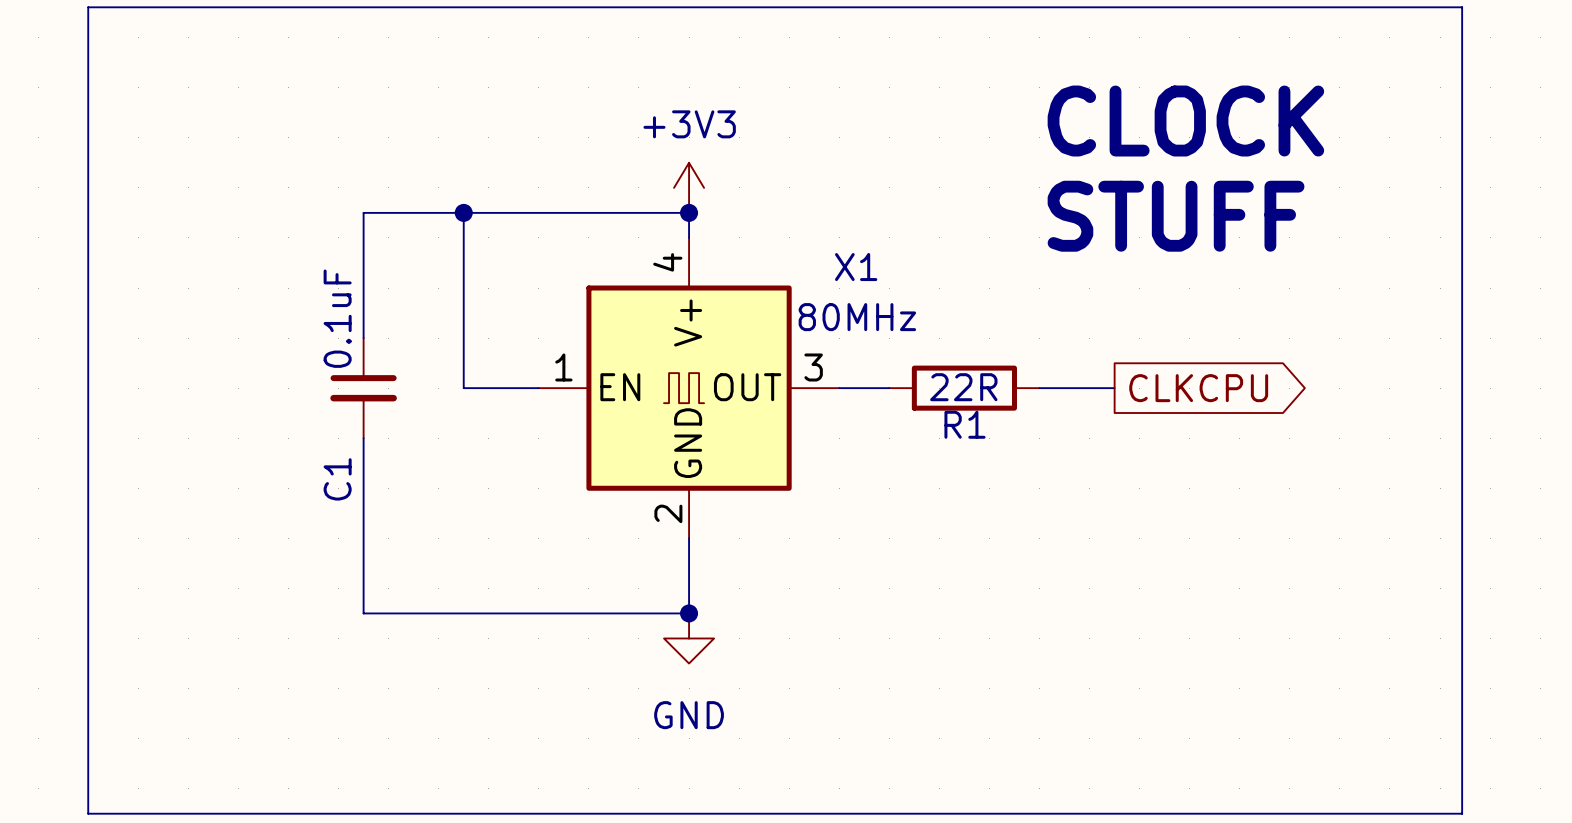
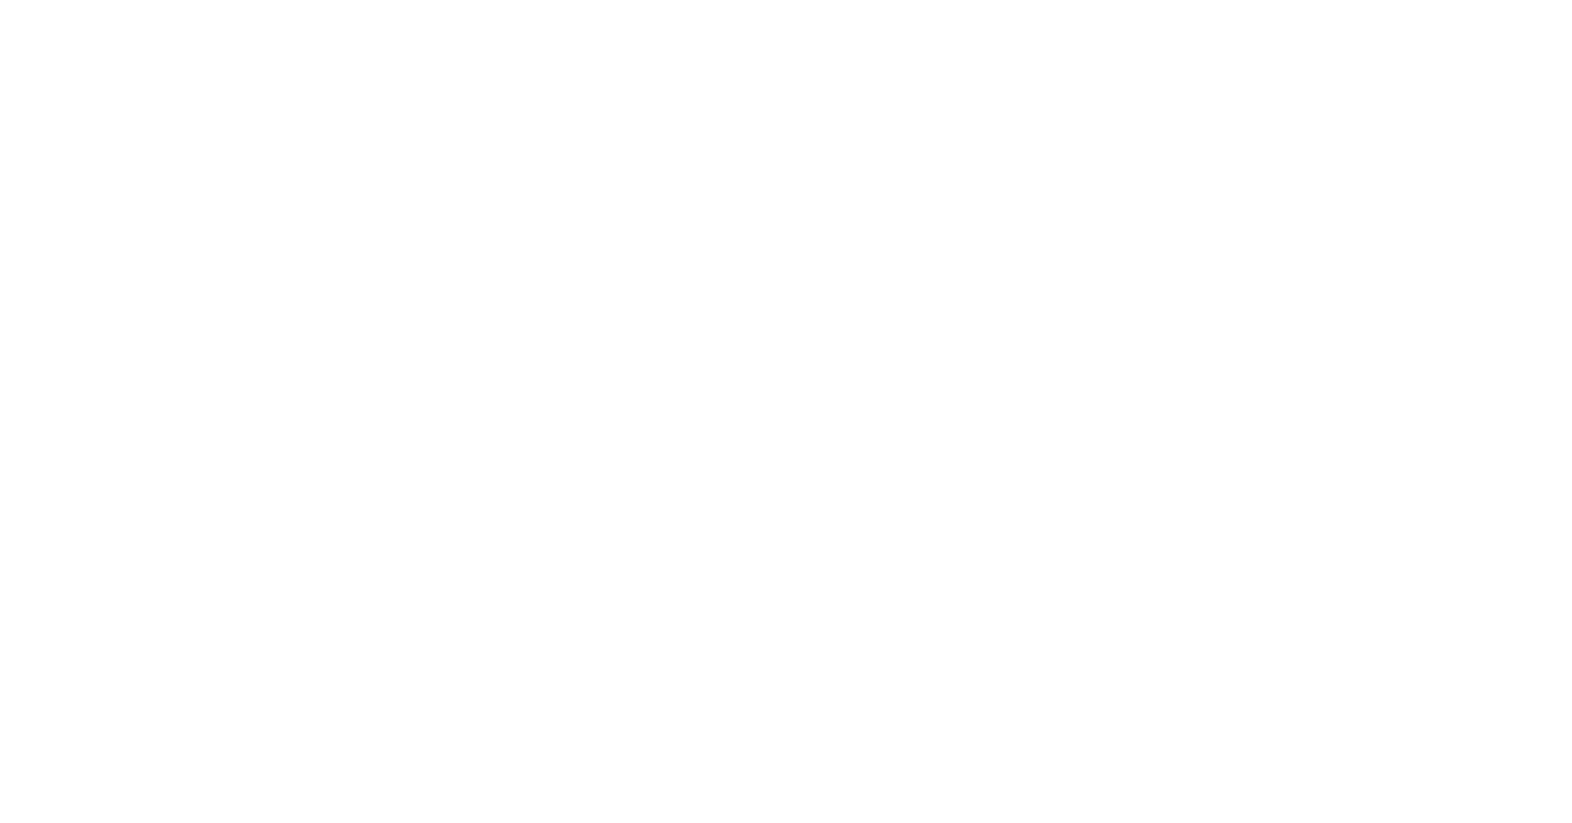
line: (88, 7) (1462, 7) (1462, 813) (88, 813) (88, 7) -> none
text: CLOCK (1185, 121) -> none
power symbol: +3V3 (689, 187) -> none
wire: (463, 212) (463, 388) (538, 388) -> none
junction: (463, 212) -> none
junction: (689, 212) -> none
text: STUFF (1176, 216) -> none
wire: (689, 237) (689, 212) (363, 212) (363, 338) -> none
C1: 0.1uF (363, 388) -> none
X1: 80MHz (689, 388) -> none
wire: (839, 388) (889, 388) -> none
R1: 22R (964, 388) -> none
wire: (1039, 388) (1114, 388) -> none
global label: CLKCPU (1198, 388) -> none
wire: (363, 438) (363, 613) (689, 613) (689, 538) -> none
junction: (689, 613) -> none
power symbol: GND (689, 638) -> none

